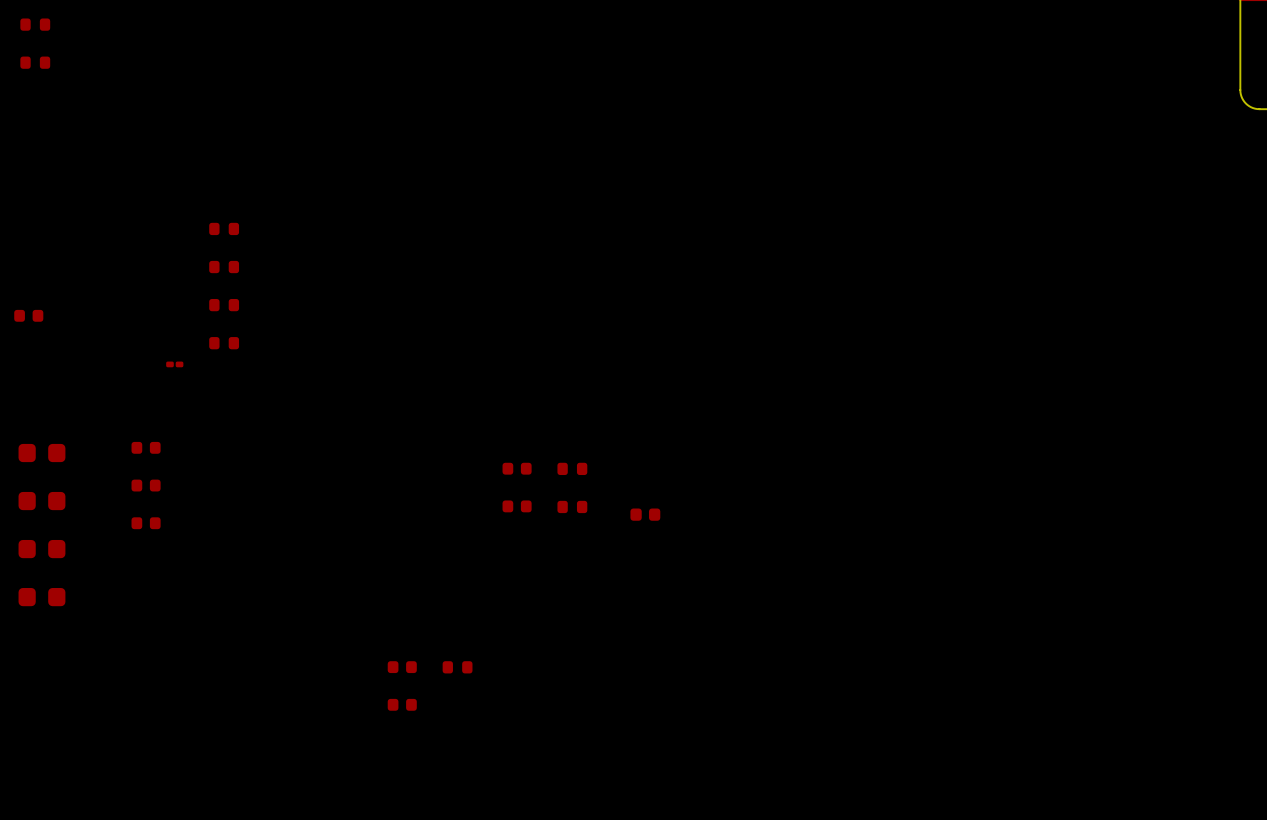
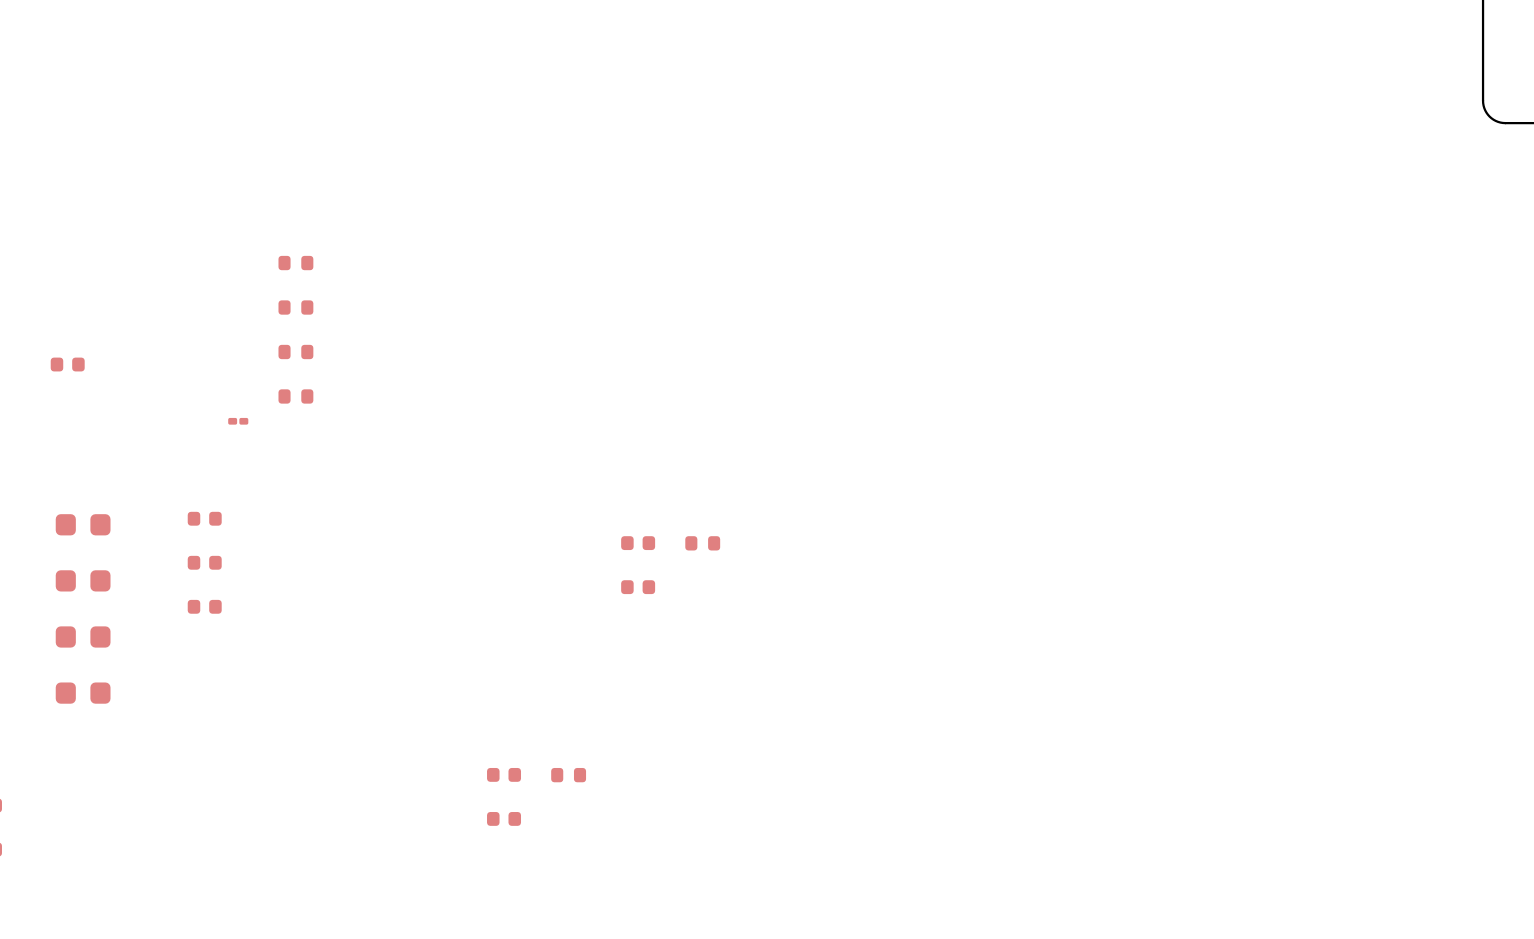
part: (35, 24) -> none
part: (35, 62) -> none
part: (572, 506) -> none
part: (645, 514) -> none

